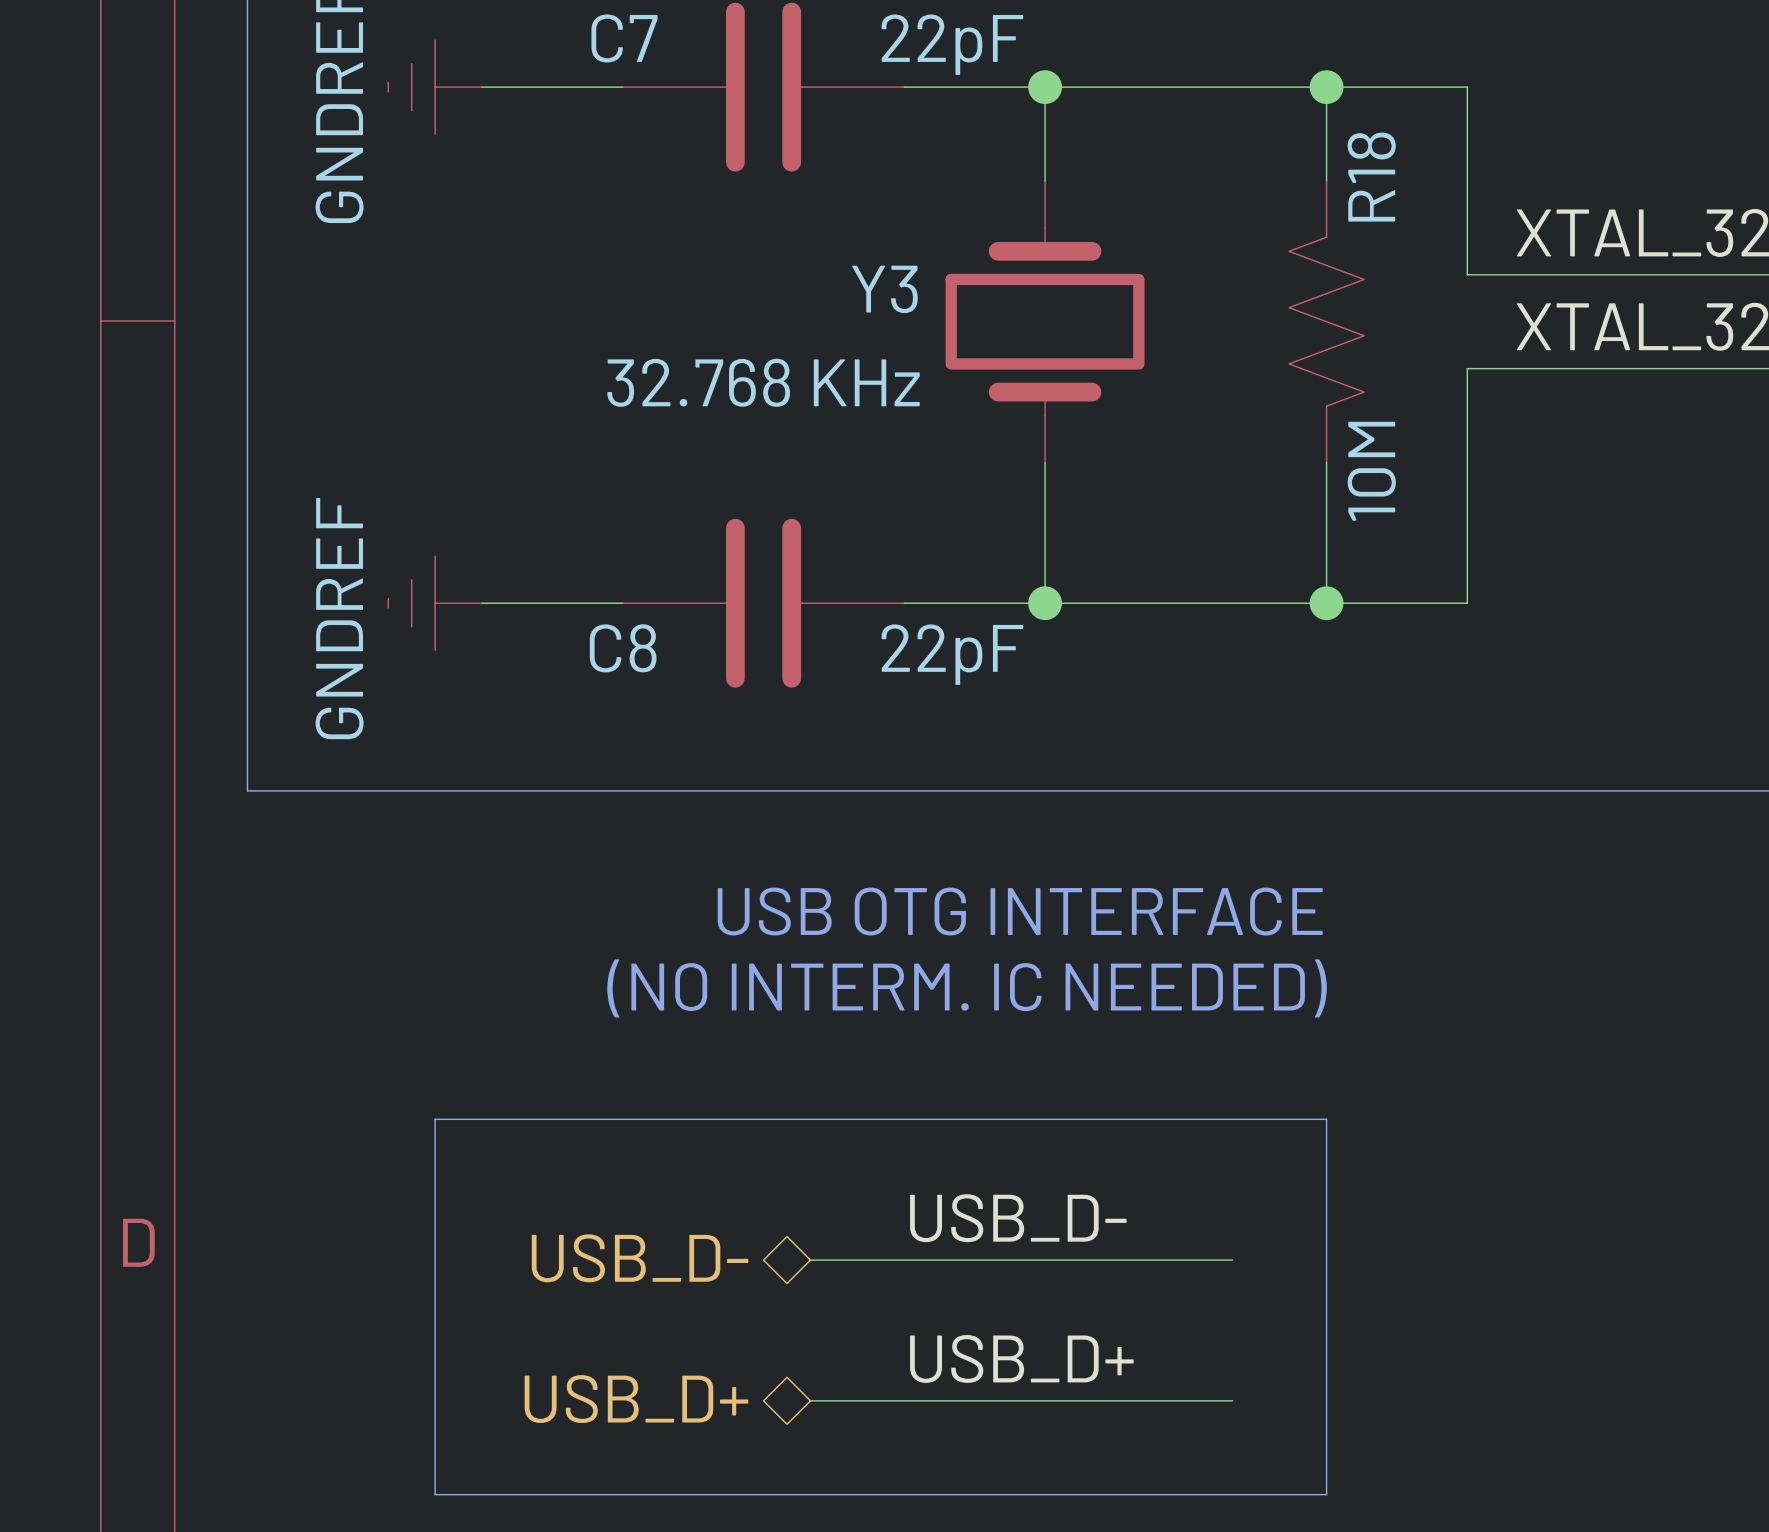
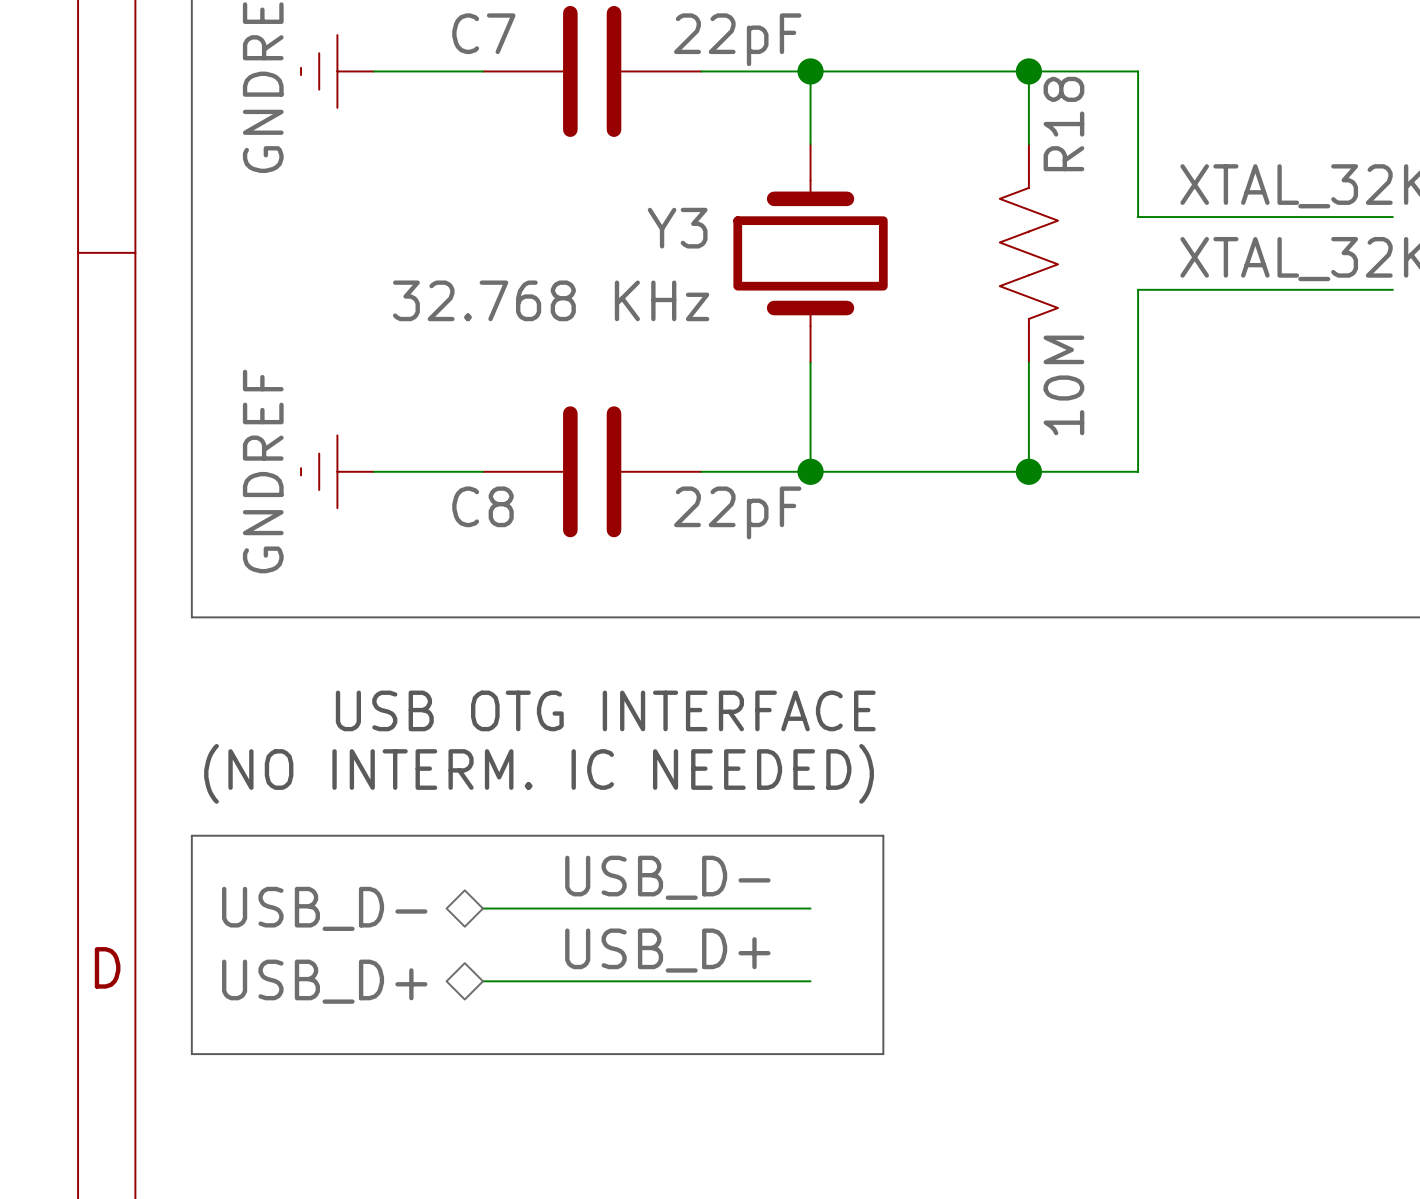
text position: USB OTG INTERFACE (1020, 911) -> USB OTG INTERFACE (605, 710)
text position: (NO INTERM. IC NEEDED) (967, 988) -> (NO INTERM. IC NEEDED) (539, 773)
line: none -> (191, 835) (191, 1054) (883, 1054) (883, 835) (191, 835)
line: (435, 1119) (435, 1494) (1326, 1494) (1326, 1119) (435, 1119) -> none
label position: USB_D- (1018, 1218) -> USB_D- (667, 877)
hierarchical label position: USB_D- (640, 1258) -> USB_D- (324, 908)
wire: (1045, 1260) (1232, 1260) -> (482, 981) (628, 981)
label position: USB_D+ (1021, 1358) -> USB_D+ (667, 950)
hierarchical label position: USB_D+ (636, 1399) -> USB_D+ (324, 981)
wire: (810, 1400) (1232, 1400) -> (482, 908) (810, 908)

